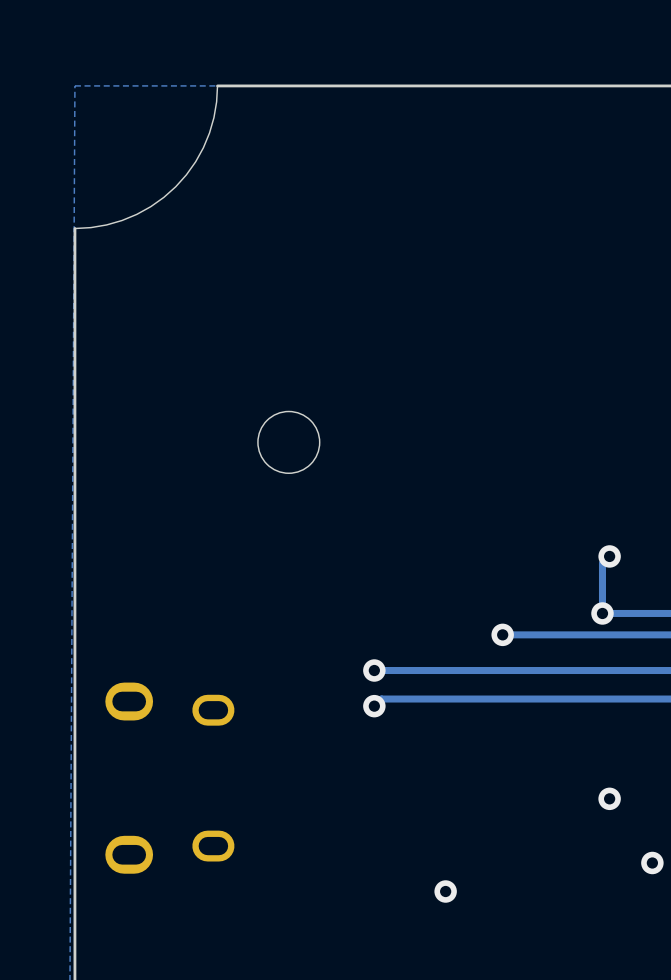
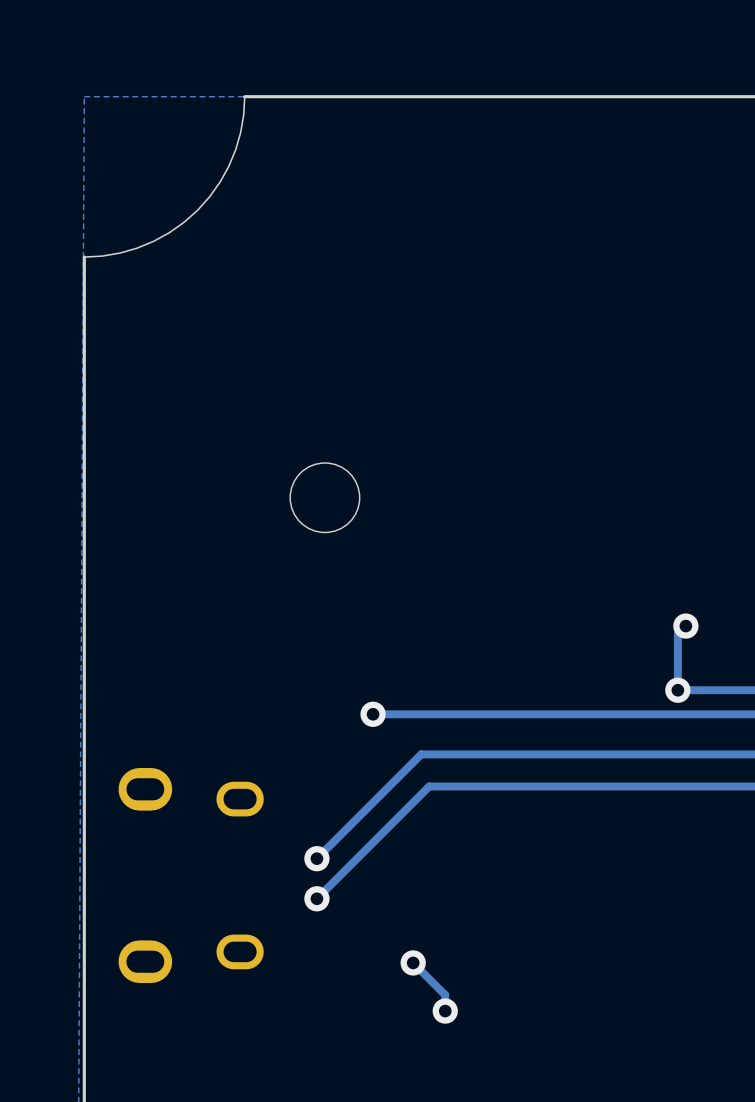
via: none -> (373, 714)
track: none -> (565, 714) (373, 714)
via: (502, 634) -> none
track: none -> (421, 754) (316, 858)
via: (374, 670) -> none
track: none -> (421, 794) (316, 898)
via: (374, 706) -> none
via: none -> (316, 858)
via: none -> (316, 898)
via: (609, 798) -> none
track: none -> (413, 962) (445, 995) (445, 1011)
via: none -> (413, 962)
via: (652, 862) -> none
via: (445, 891) -> none
via: none -> (445, 1011)

